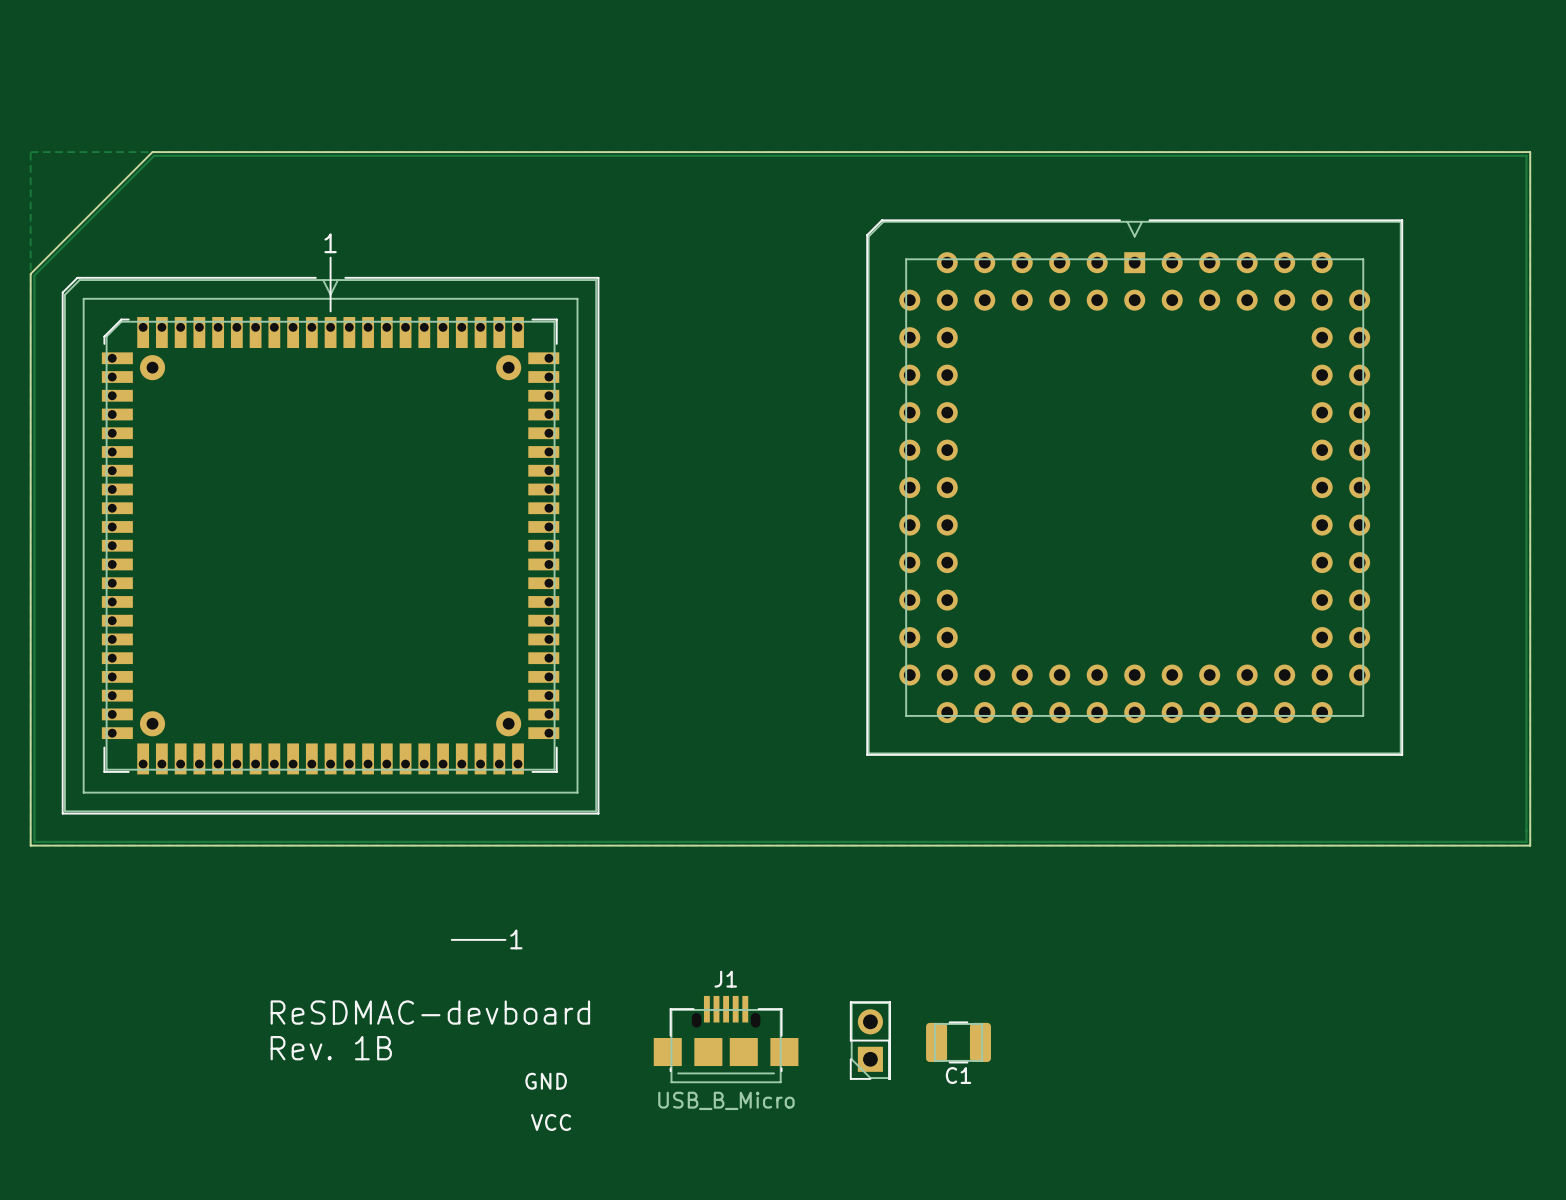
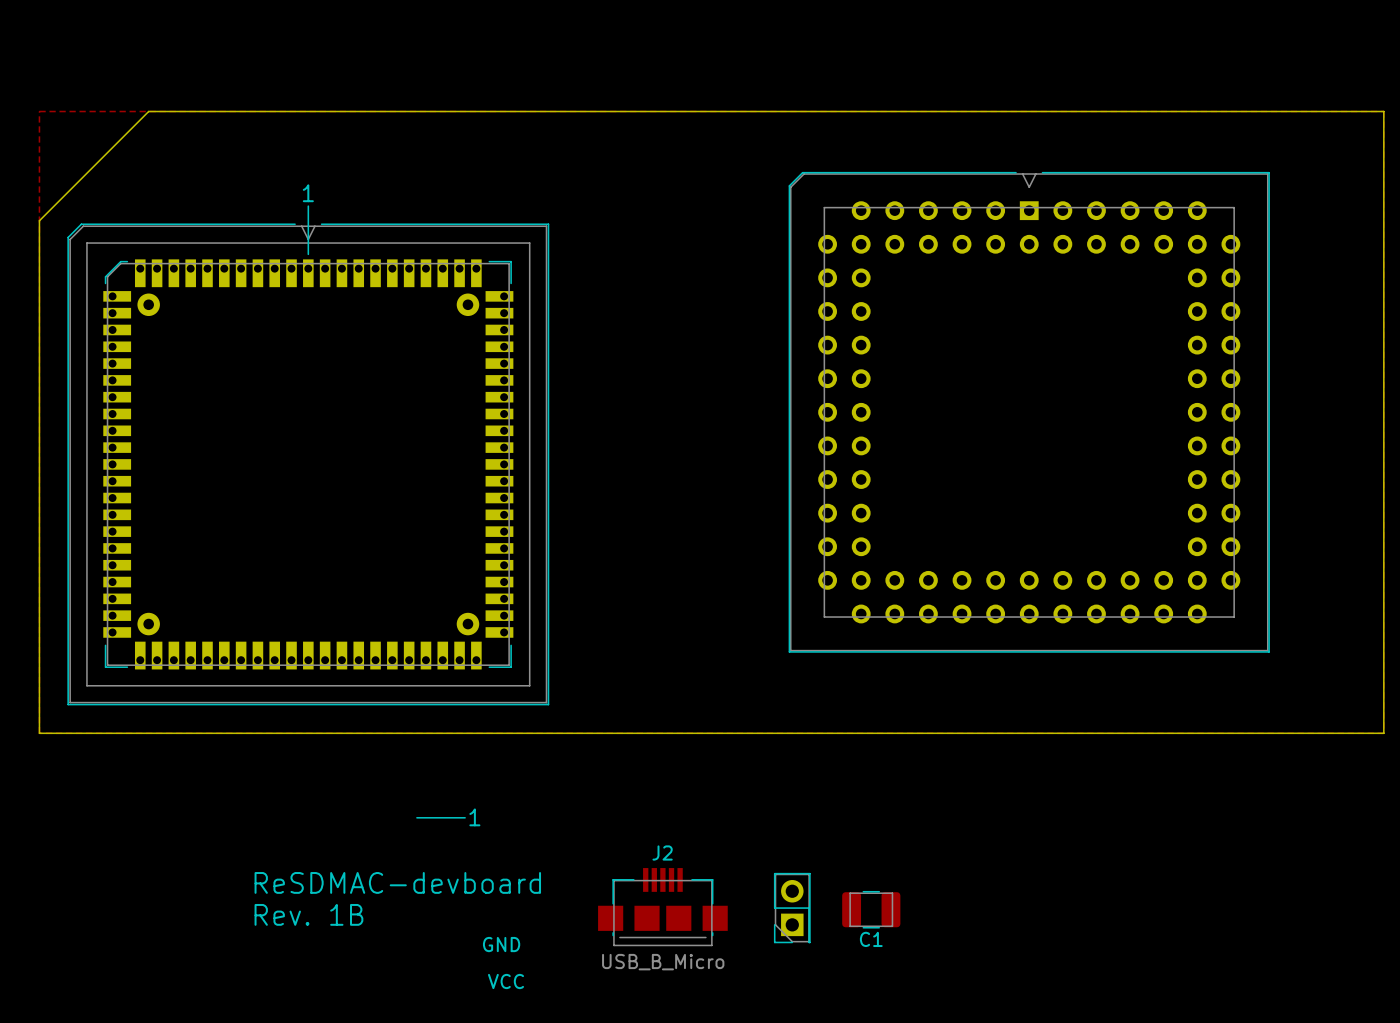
track: (154, 155) (1526, 155) (1526, 841) (34, 841) (34, 275) (154, 155) -> none
J1 name: J1 (725, 979) -> J2 (662, 852)

